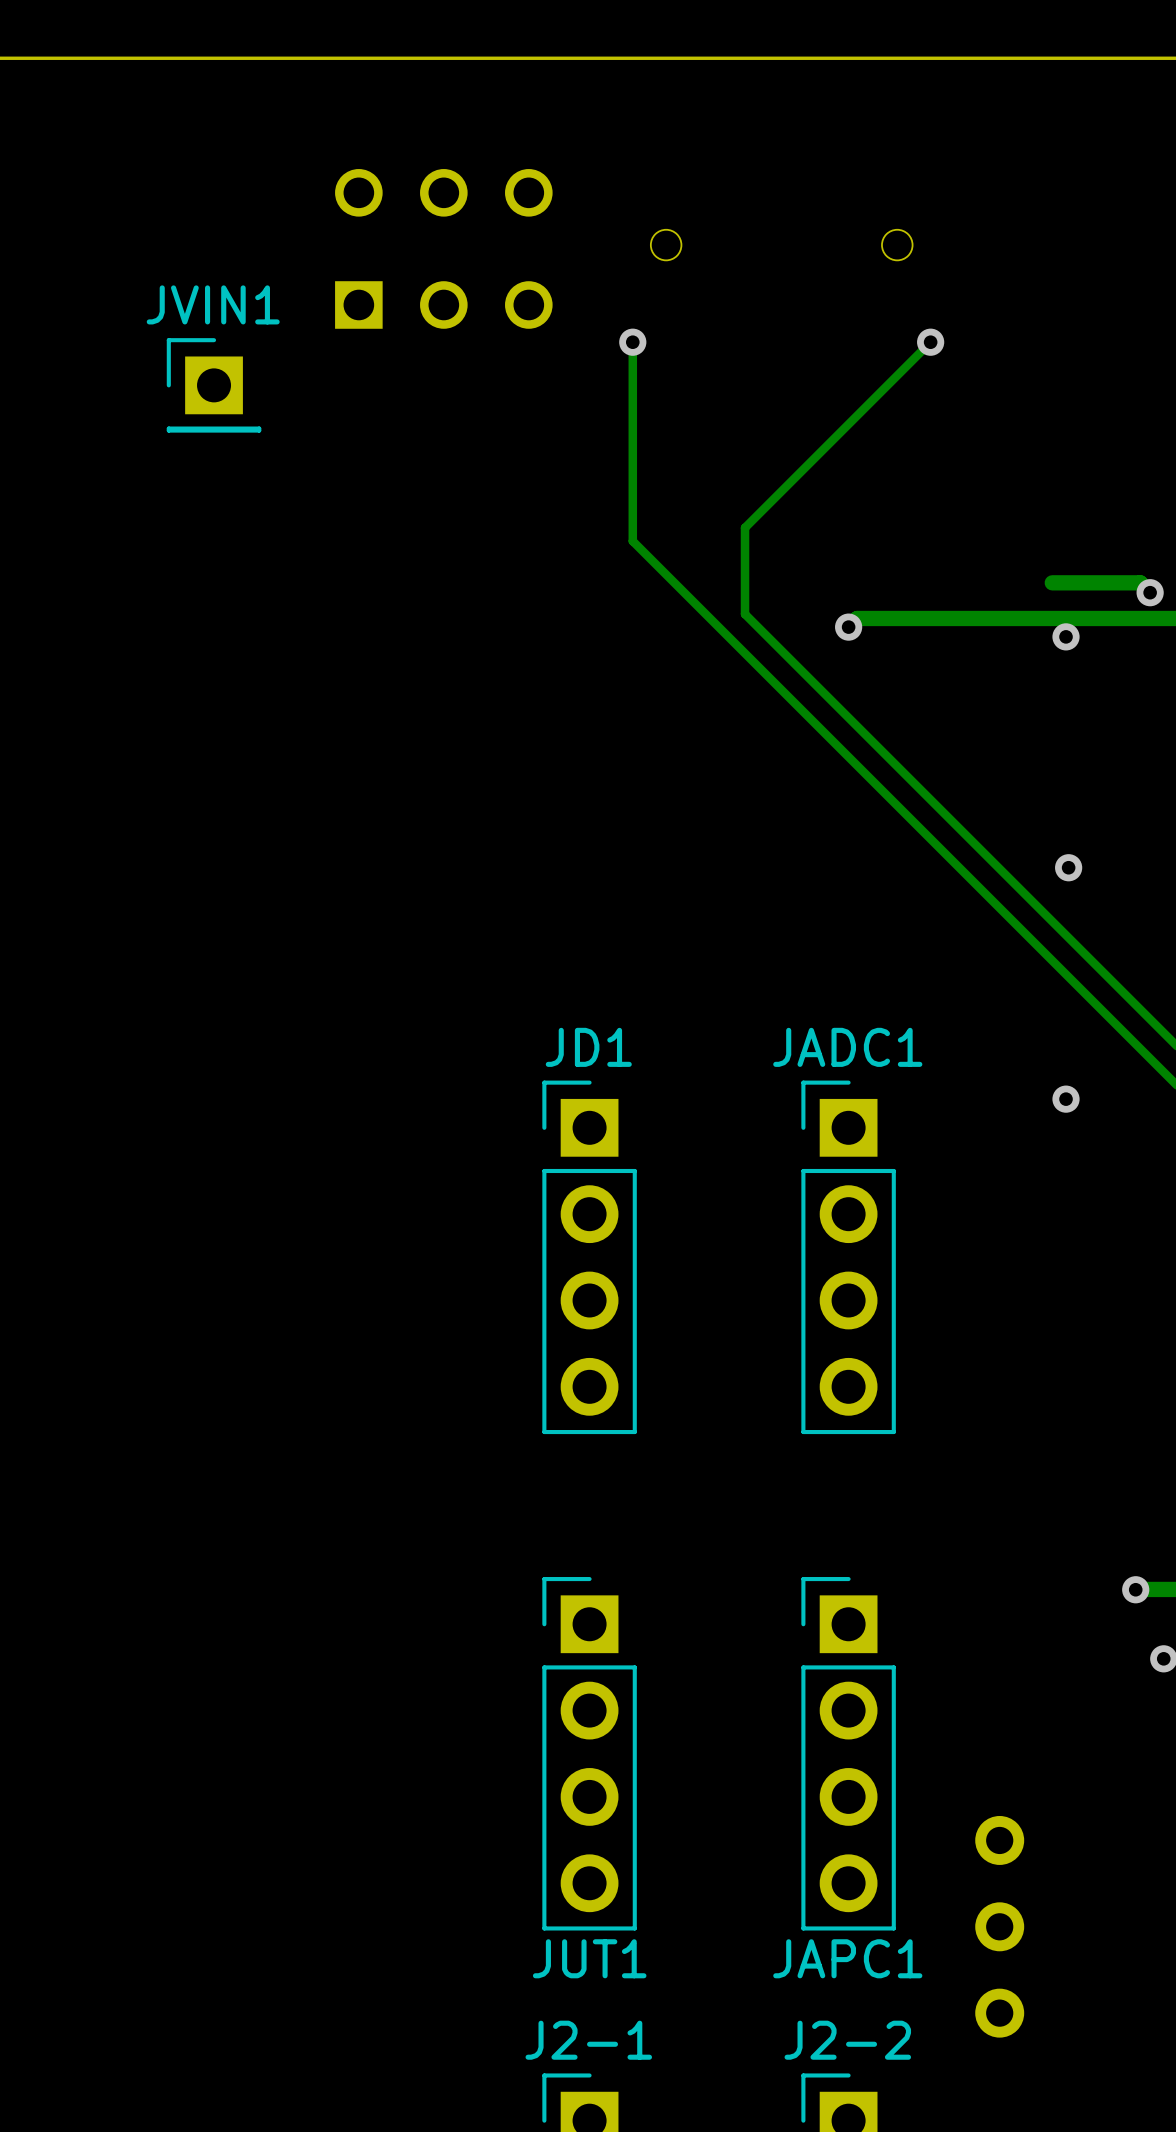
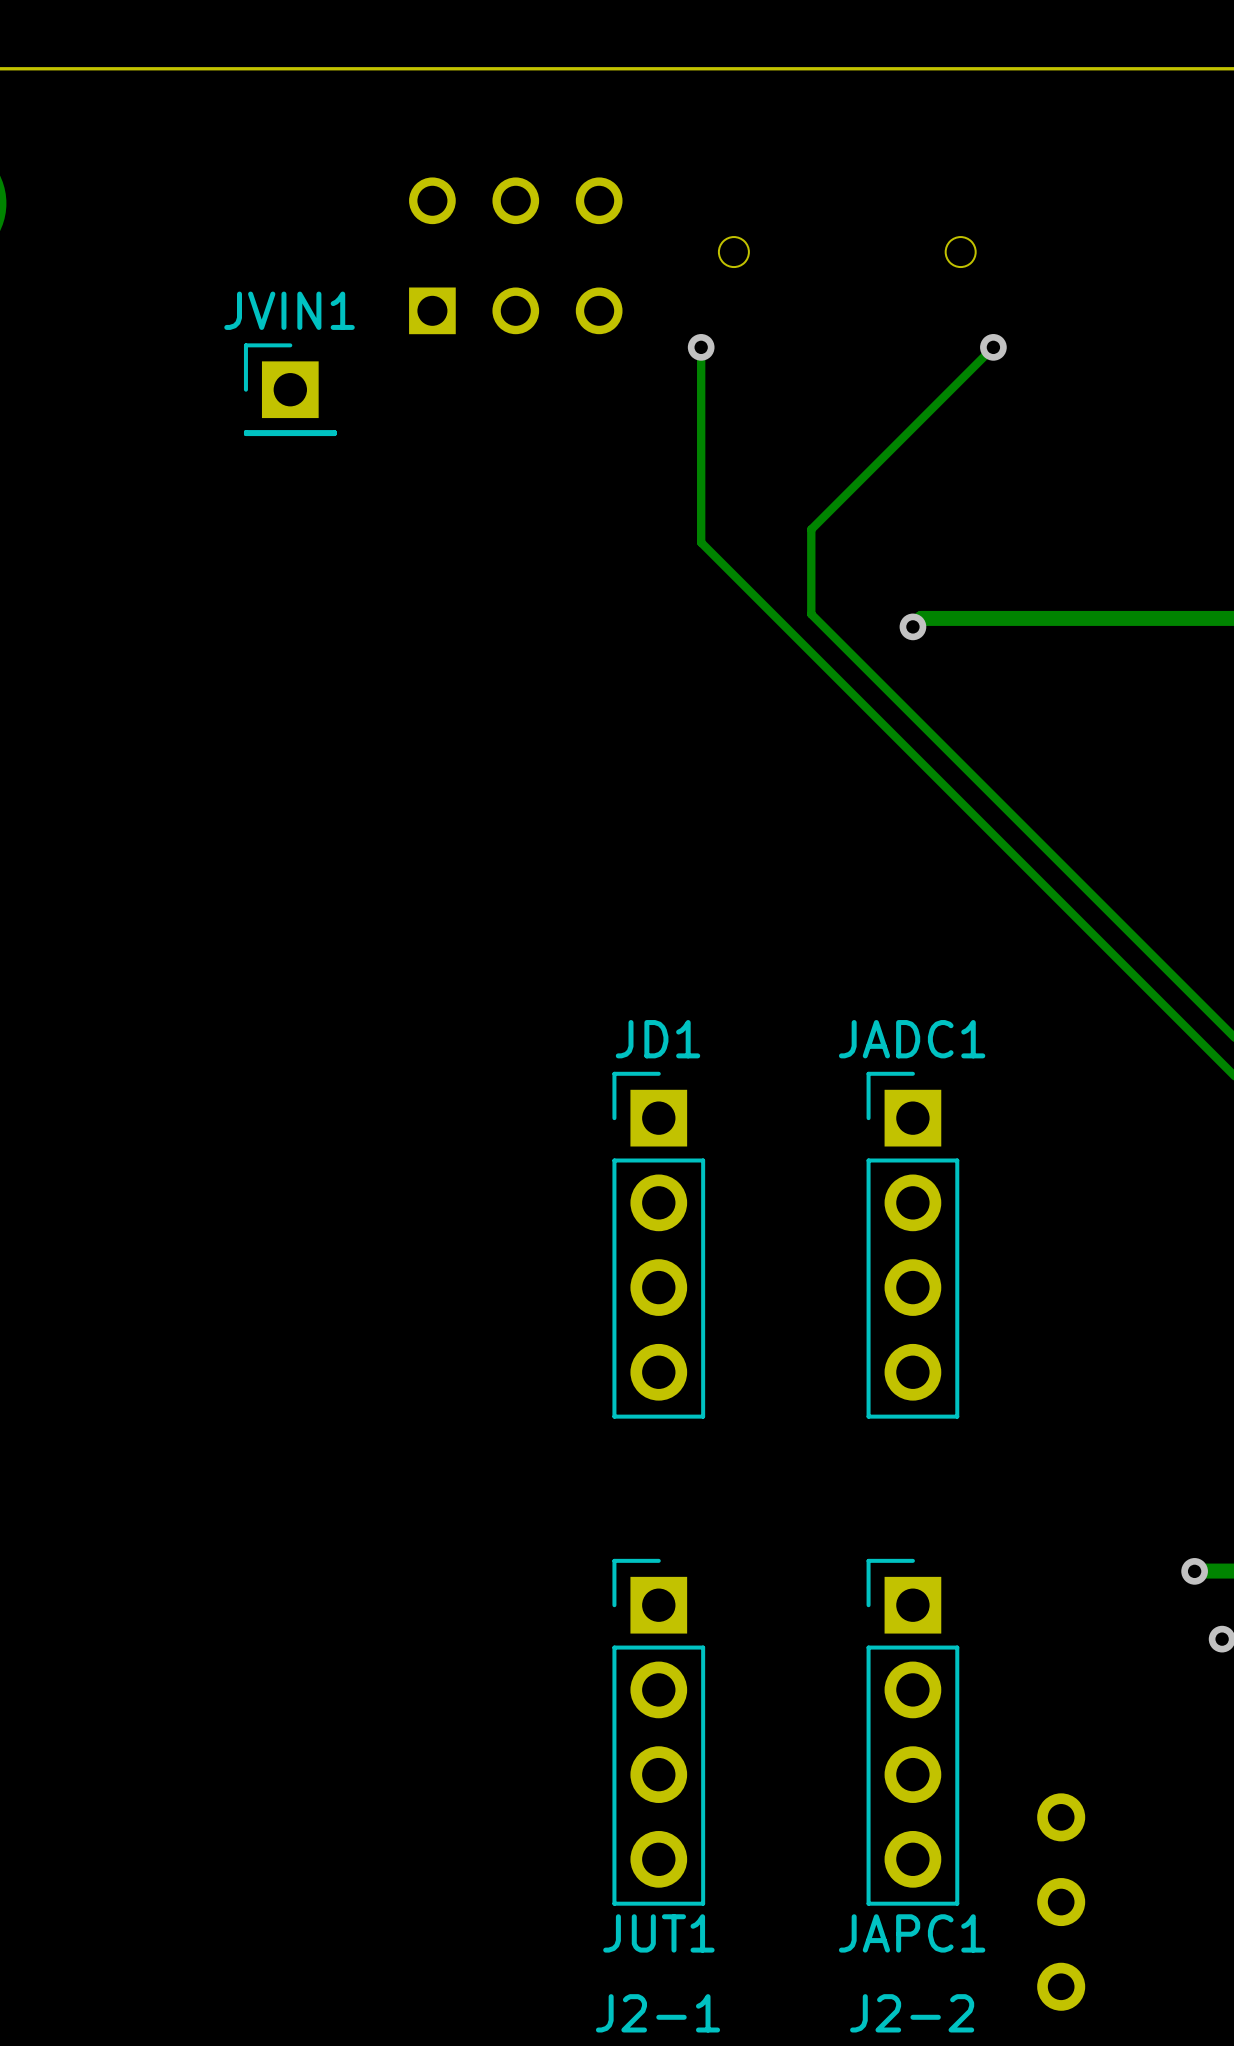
track: (1052, 582) (1140, 582) (1150, 592) -> none
via: (1150, 592) -> none
via: (1066, 636) -> none
via: (1068, 867) -> none
via: (1066, 1099) -> none

